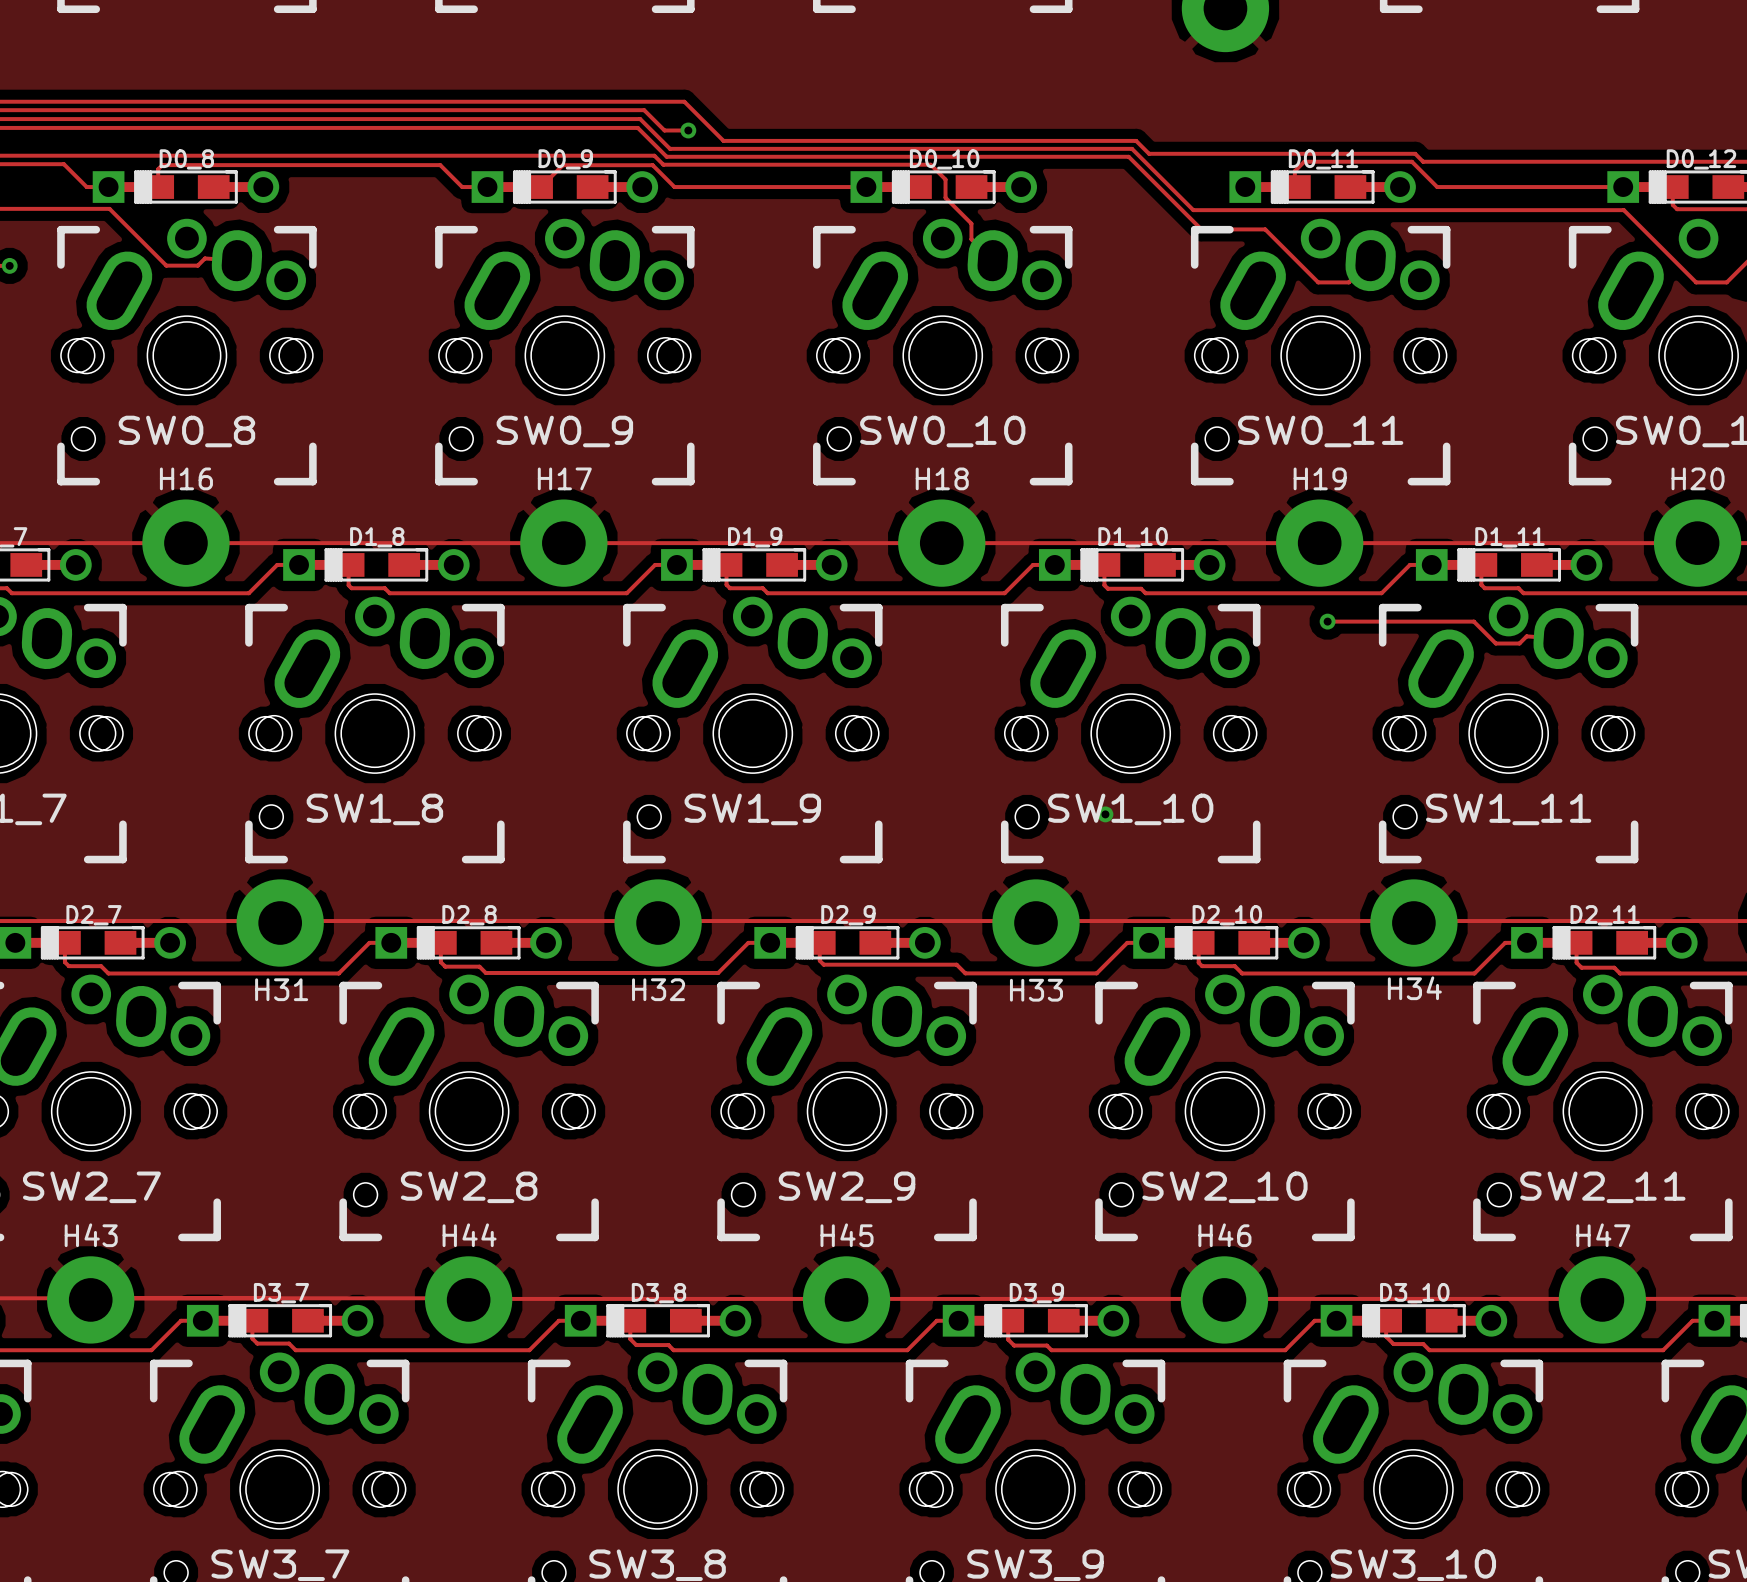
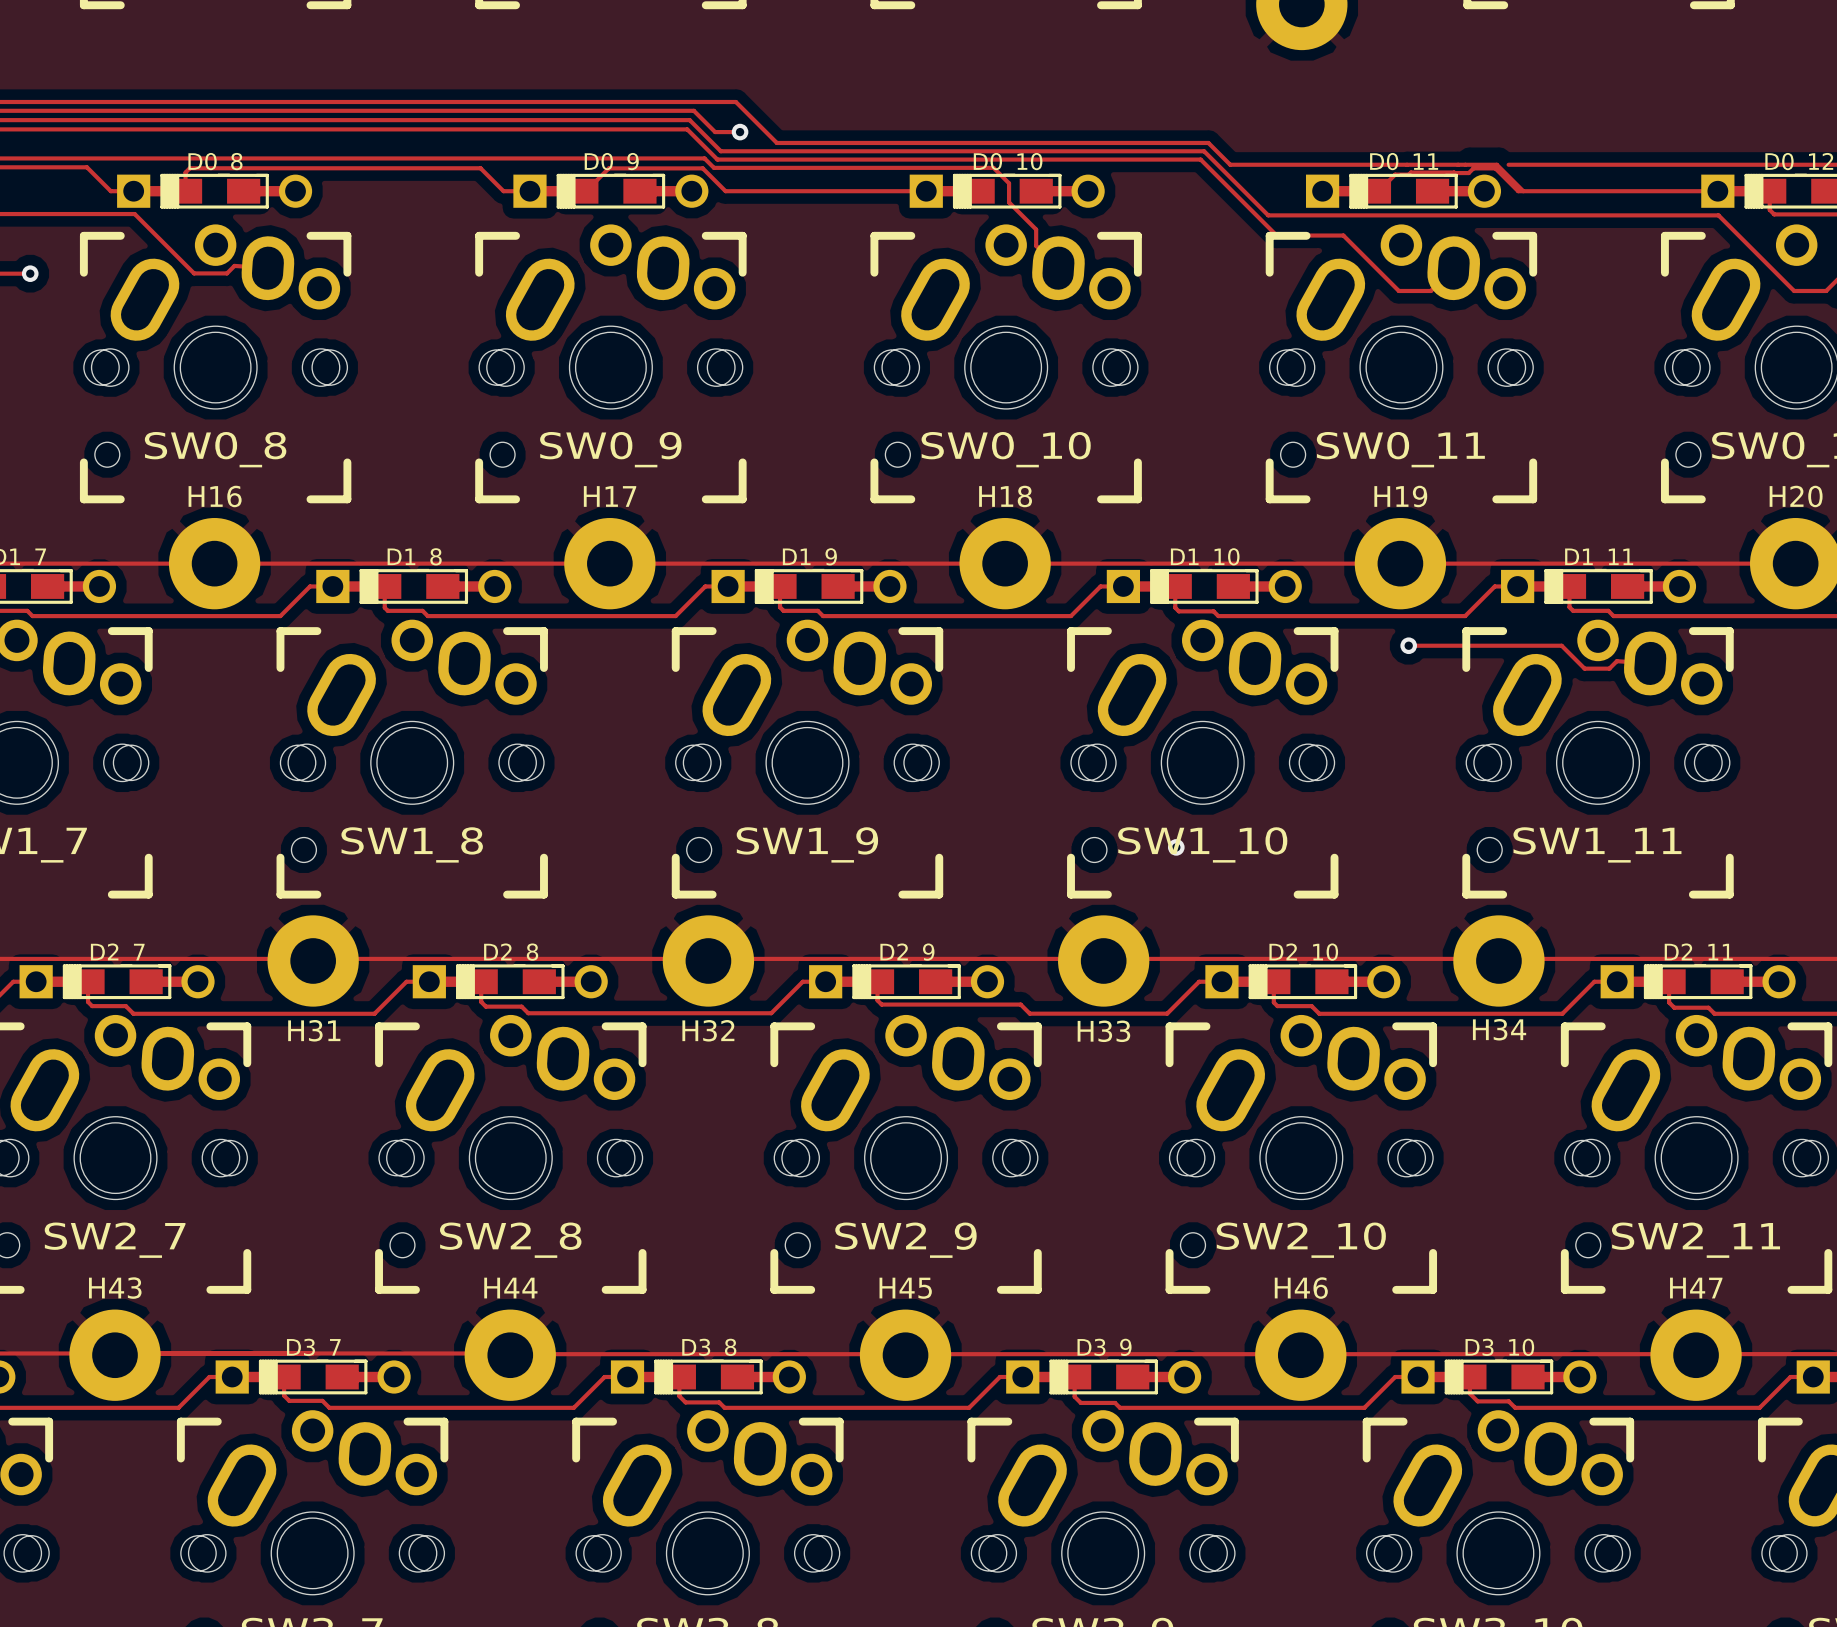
track: (1149, 153) (1415, 153) (1423, 161) -> (1221, 156) (1230, 164) (1384, 164)
track: (1304, 161) (1294, 171) (1294, 187) -> (1523, 191) (1518, 191) (1495, 168) (1473, 168) (1468, 173) (1410, 172) (1408, 174) (1395, 174) (1378, 191) (1374, 191)

